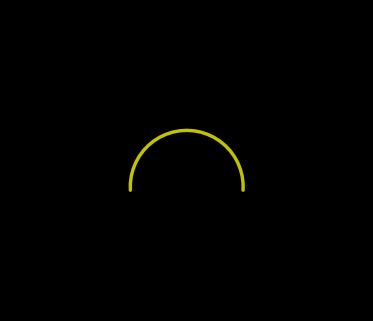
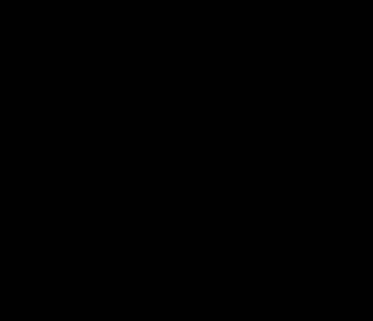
board edge: (243, 190) (240, 169) (230, 150) (213, 137) (200, 132) (186, 130) (172, 132) (159, 137) (143, 150) (133, 169) (130, 190) -> none

